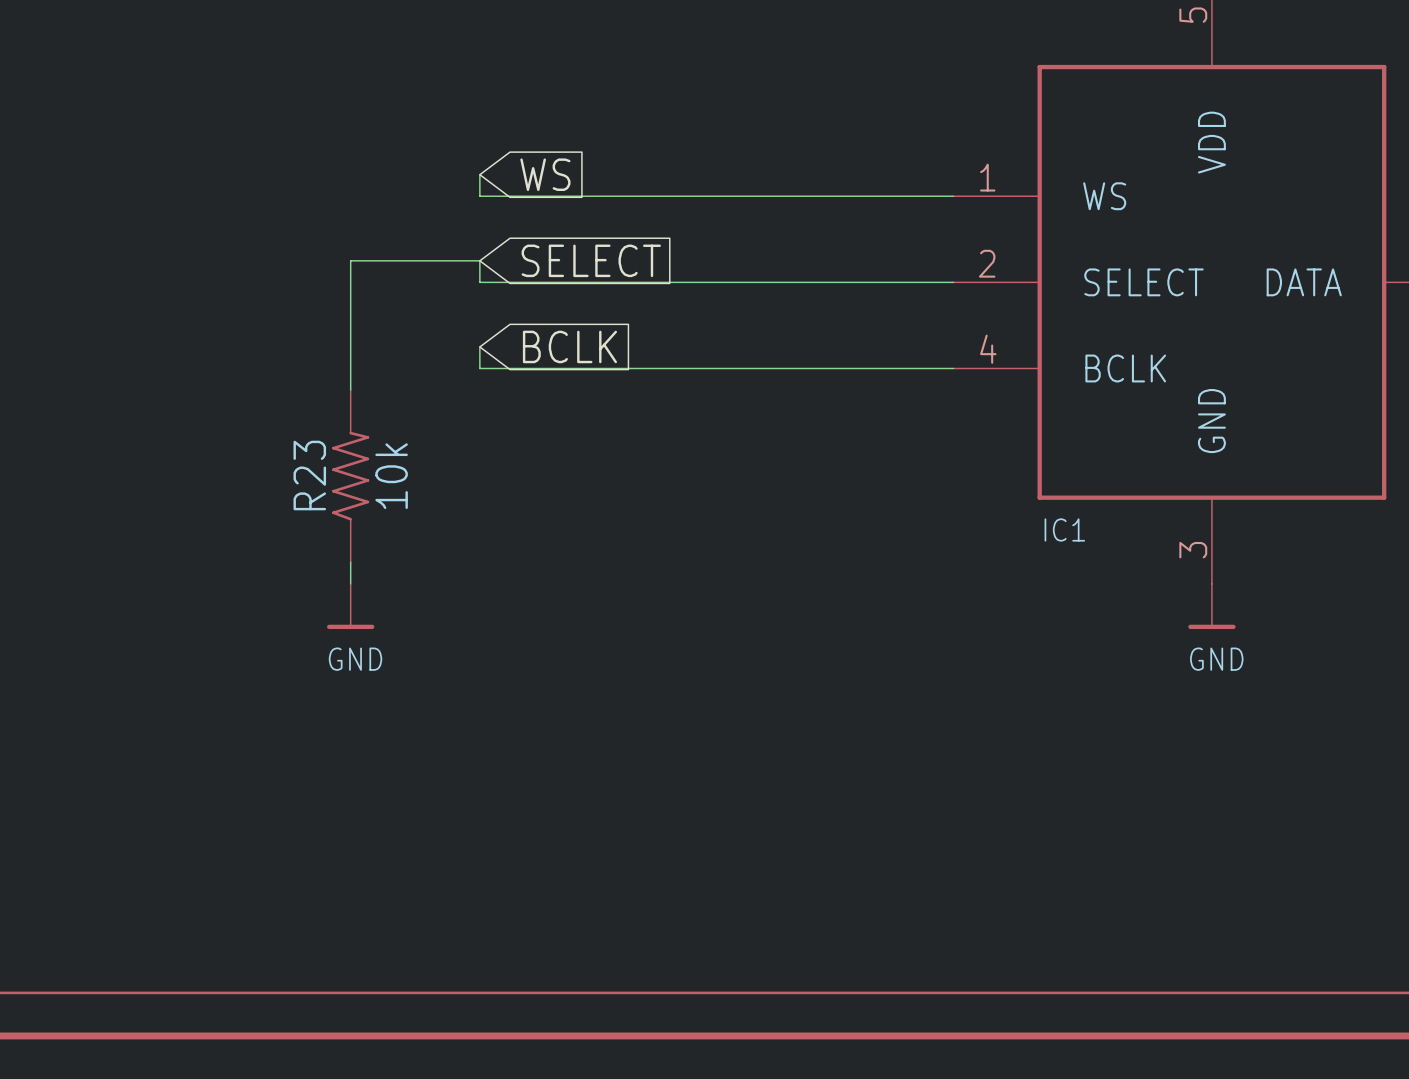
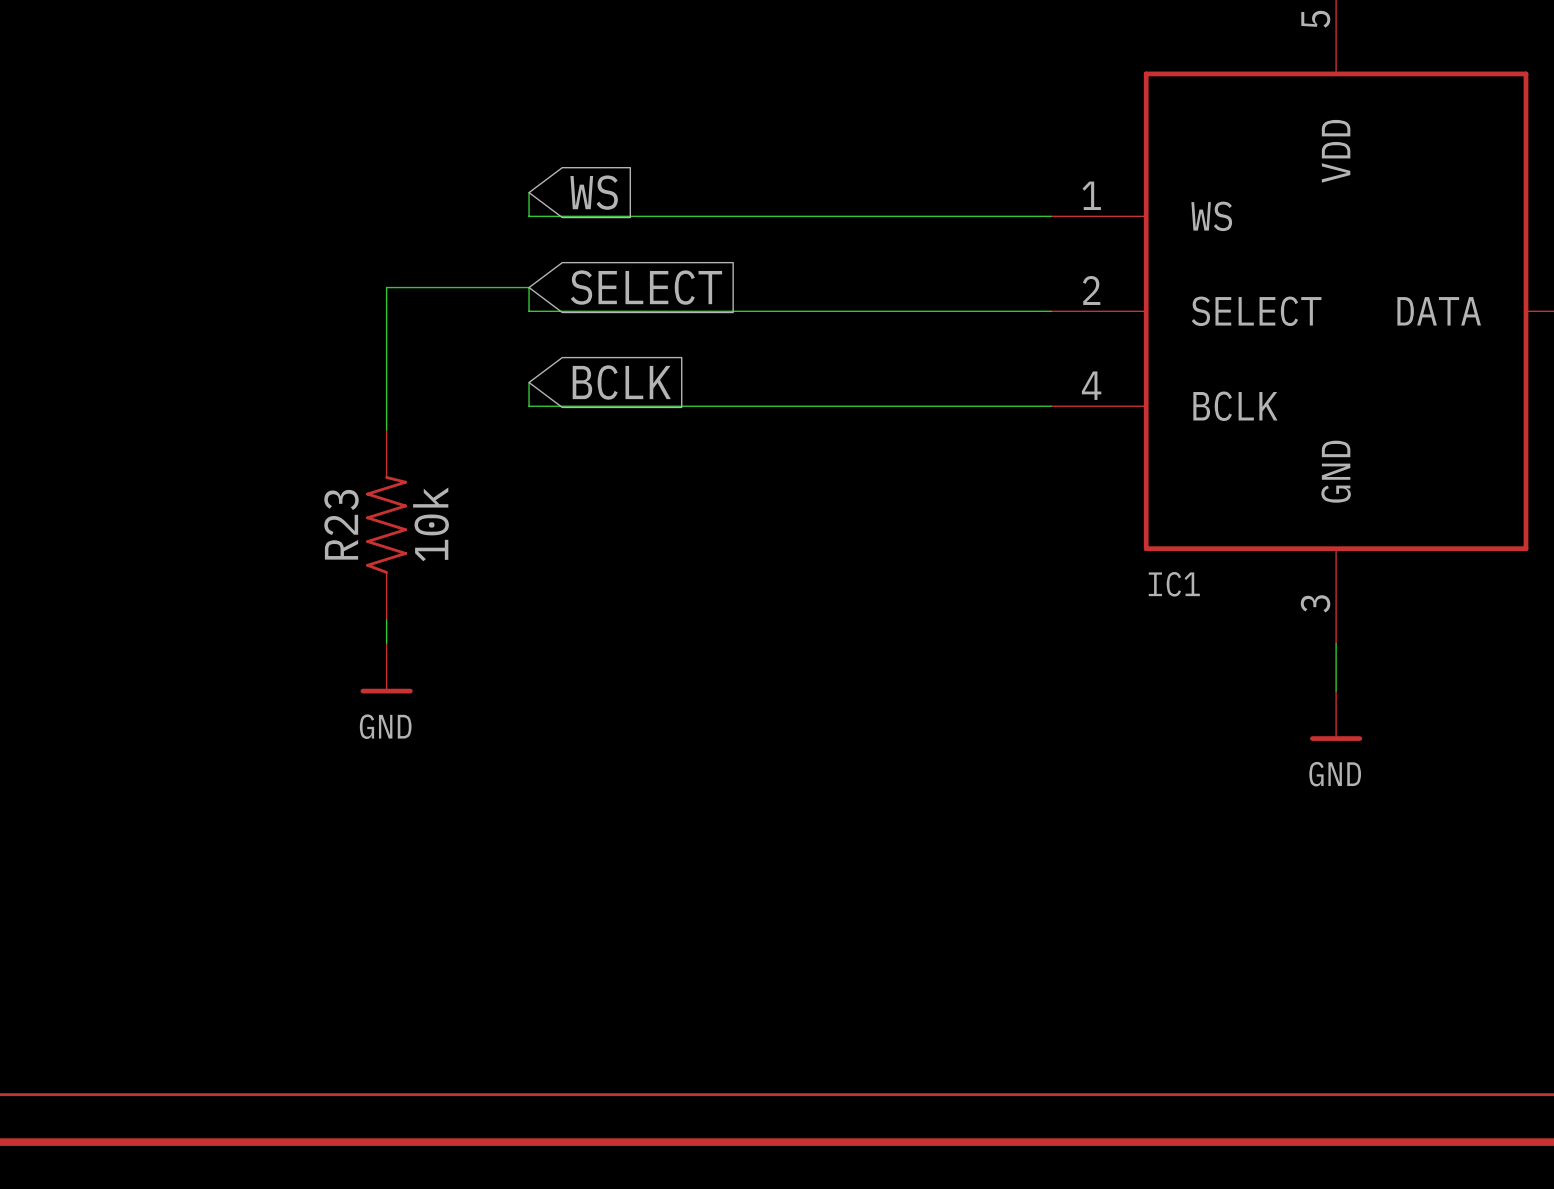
power symbol position: GND (1211, 606) -> GND (1336, 716)

